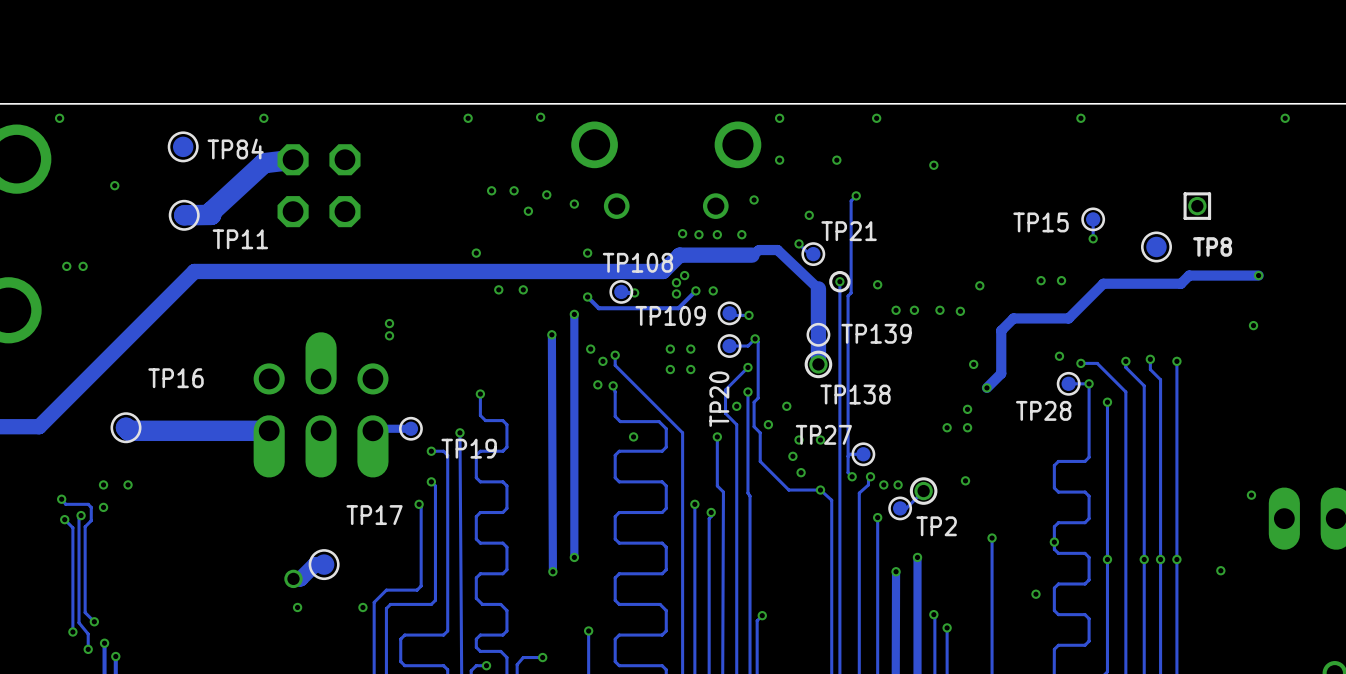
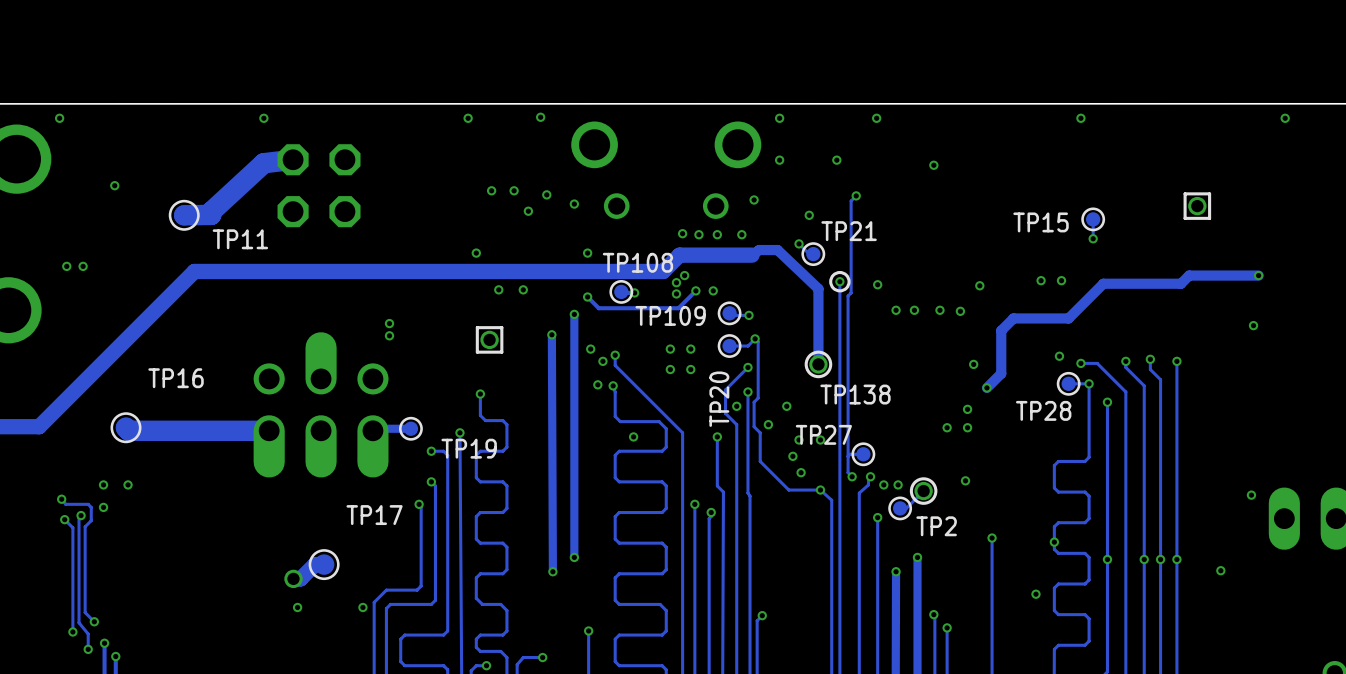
TP84: (183, 146) -> none
TP8: (1156, 246) -> none
track width: thick (818, 288) (818, 364) -> thin (818, 288) (818, 364)
TP139: (818, 334) -> none
part: none -> (489, 339)

